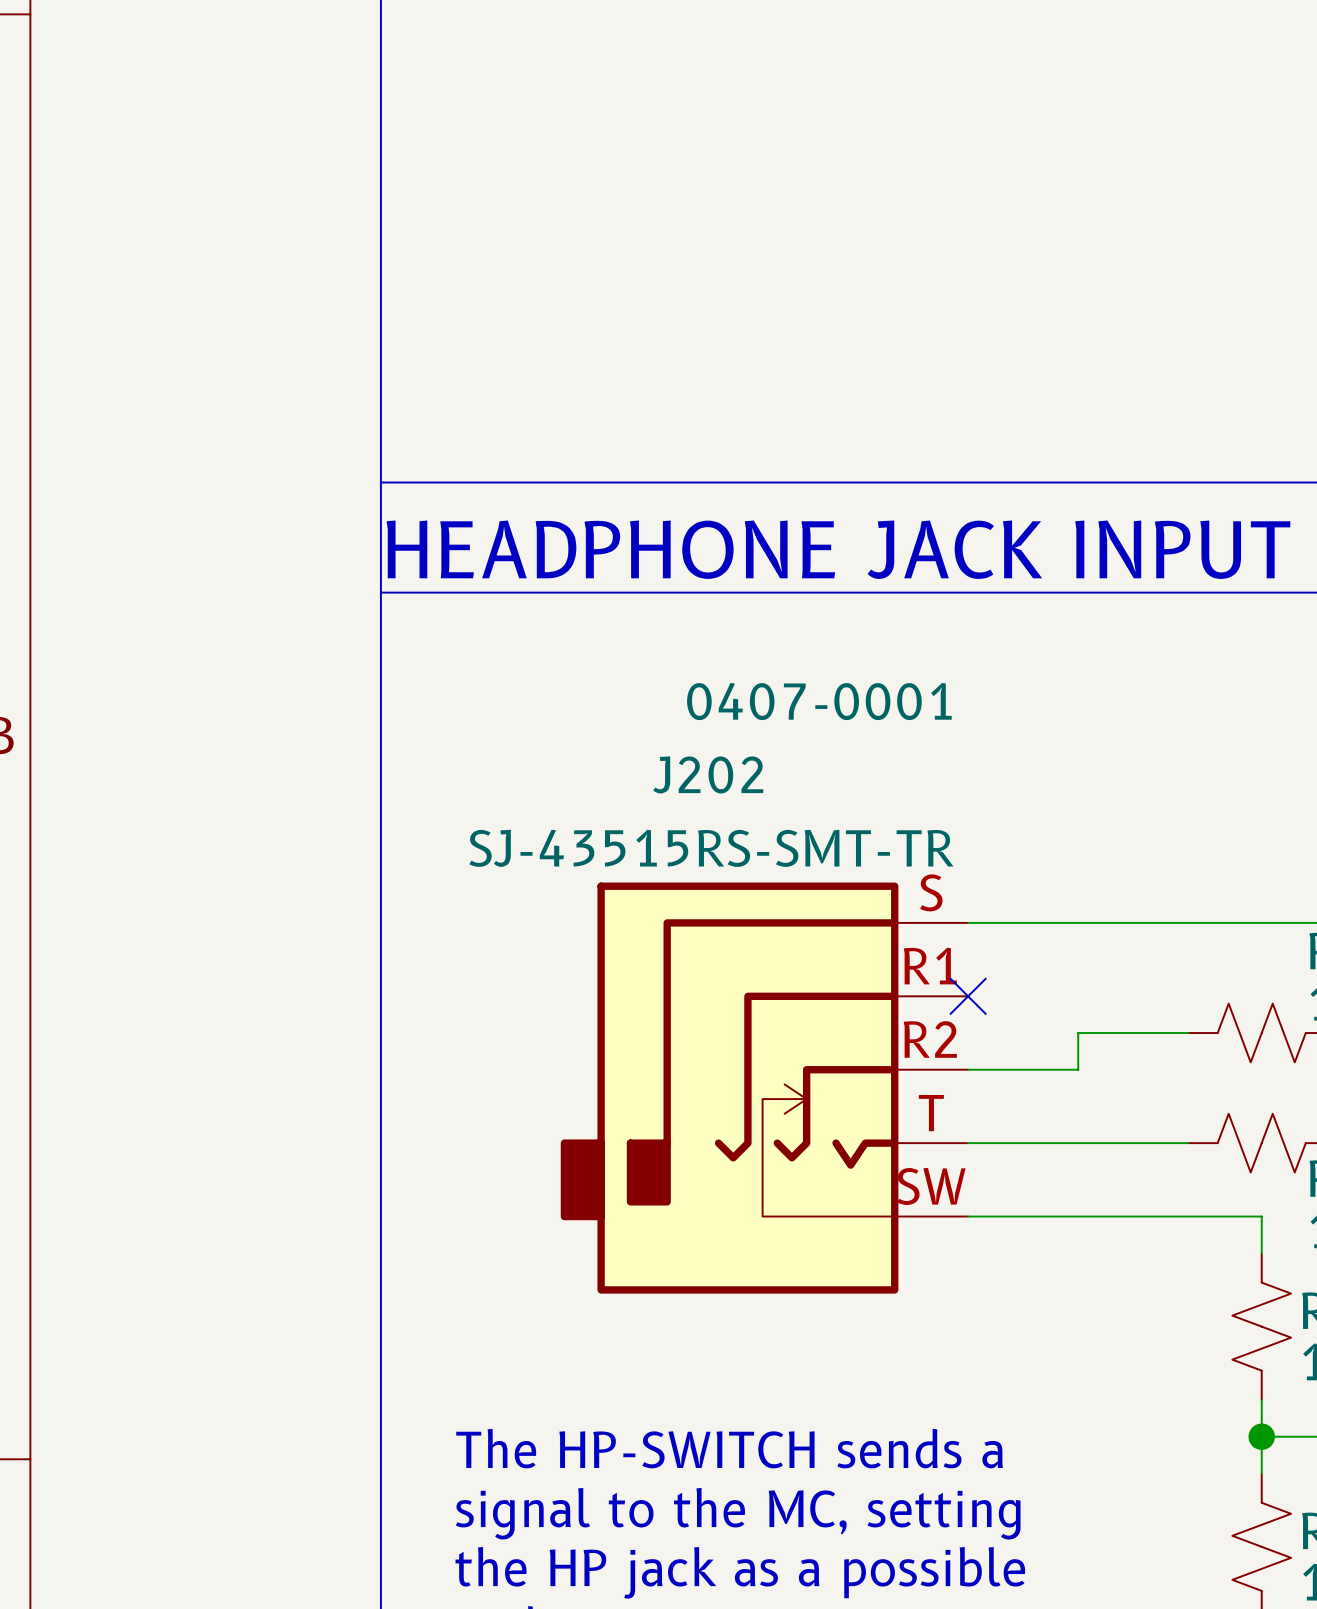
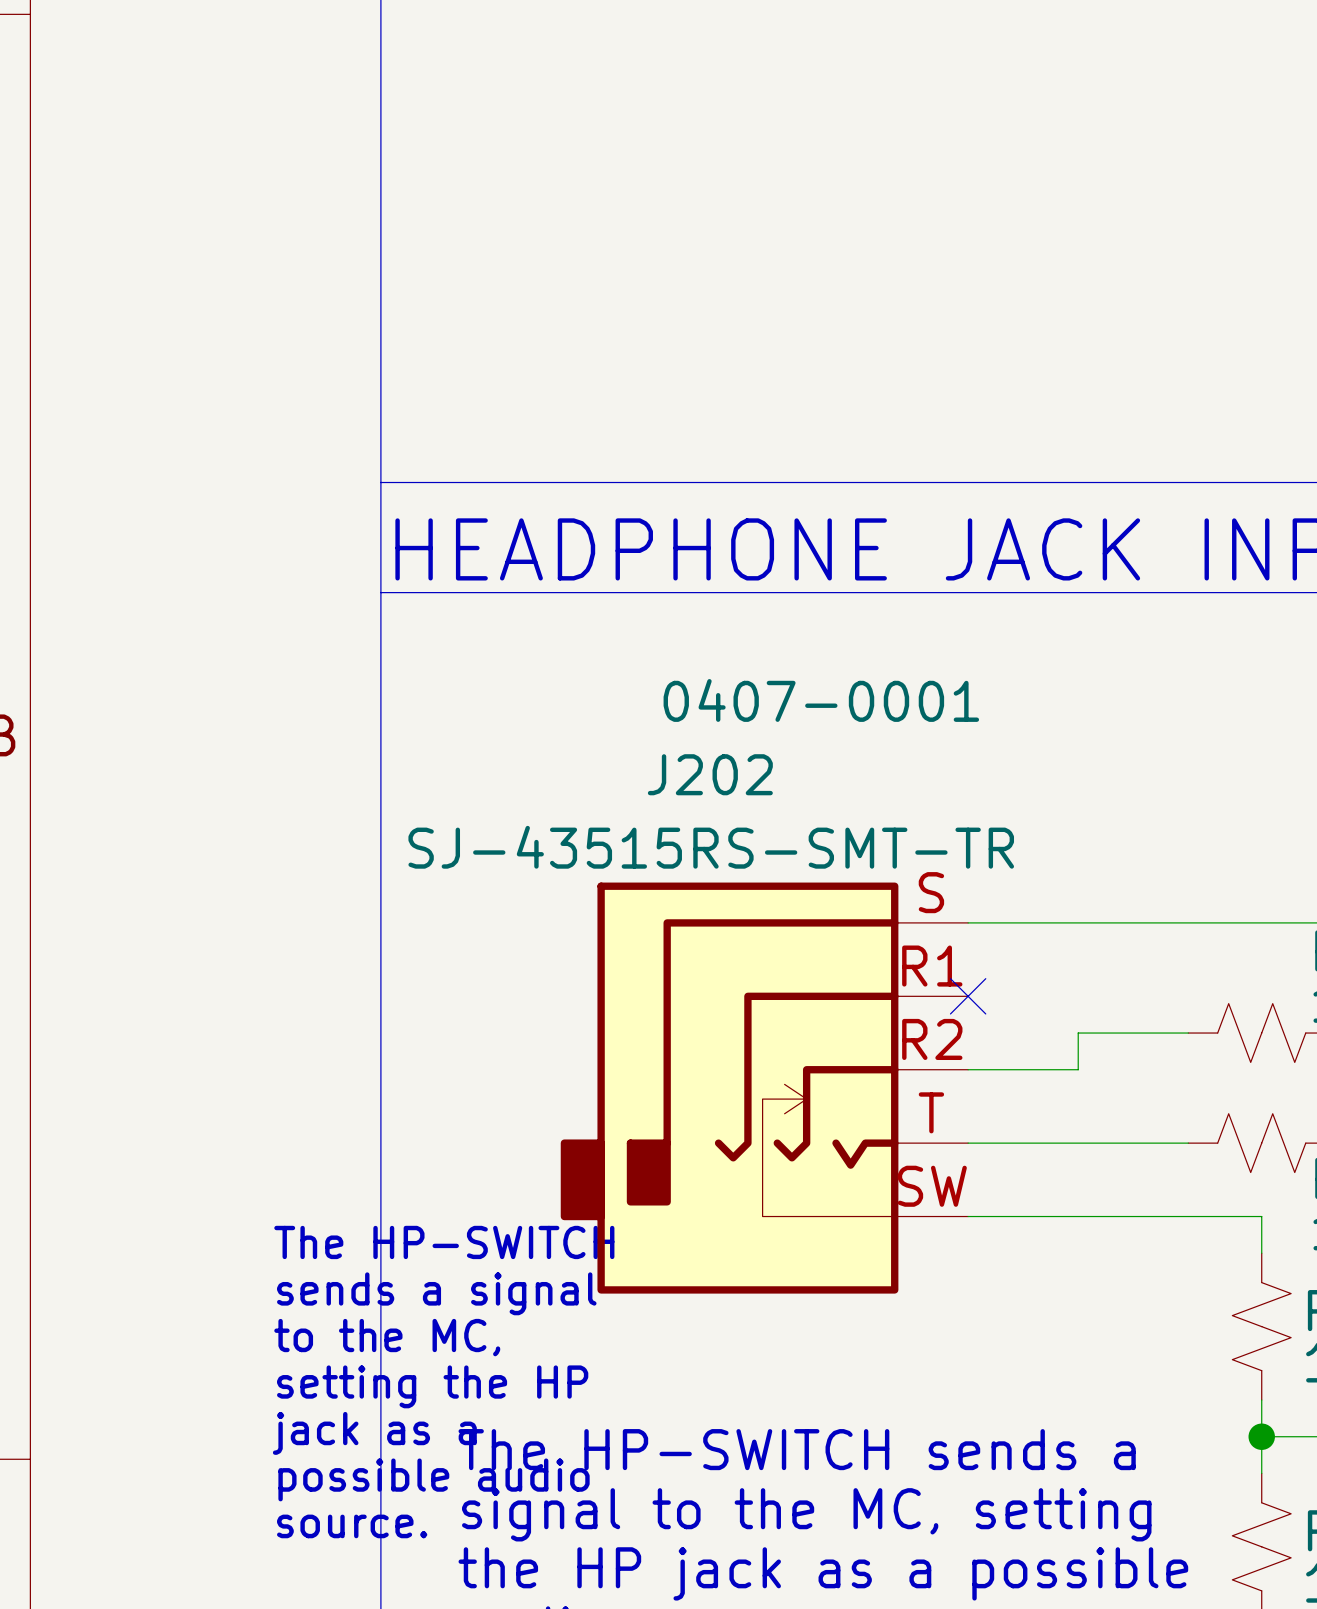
text: none -> The HP-SWITCH (444, 1242)
text: none -> sends a signal (436, 1293)
text: none -> to the MC, (387, 1337)
text: none -> setting the HP (432, 1386)
text: none -> jack as a (374, 1433)
text: none -> possible audio (434, 1479)
text: none -> source. (352, 1526)

